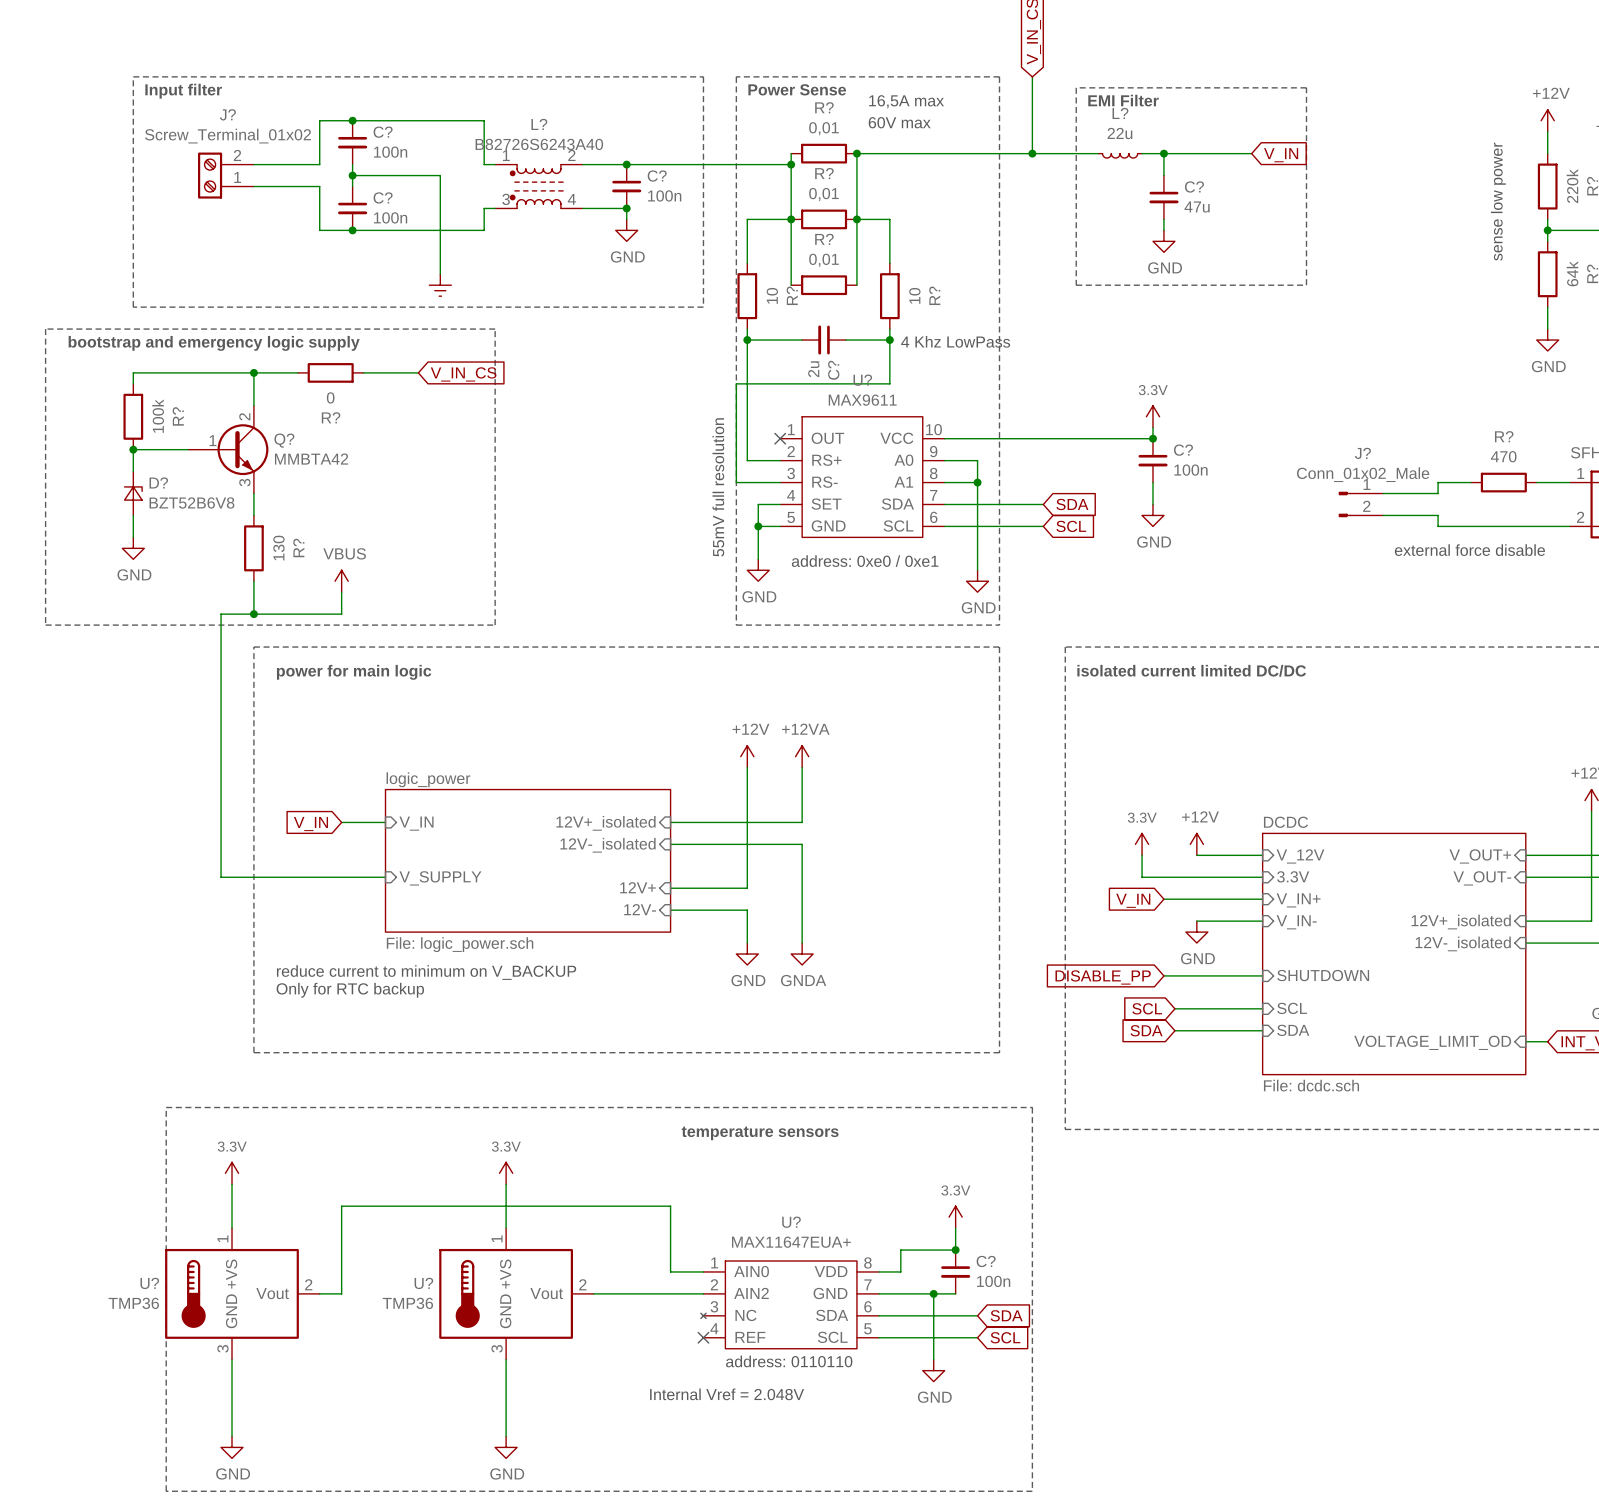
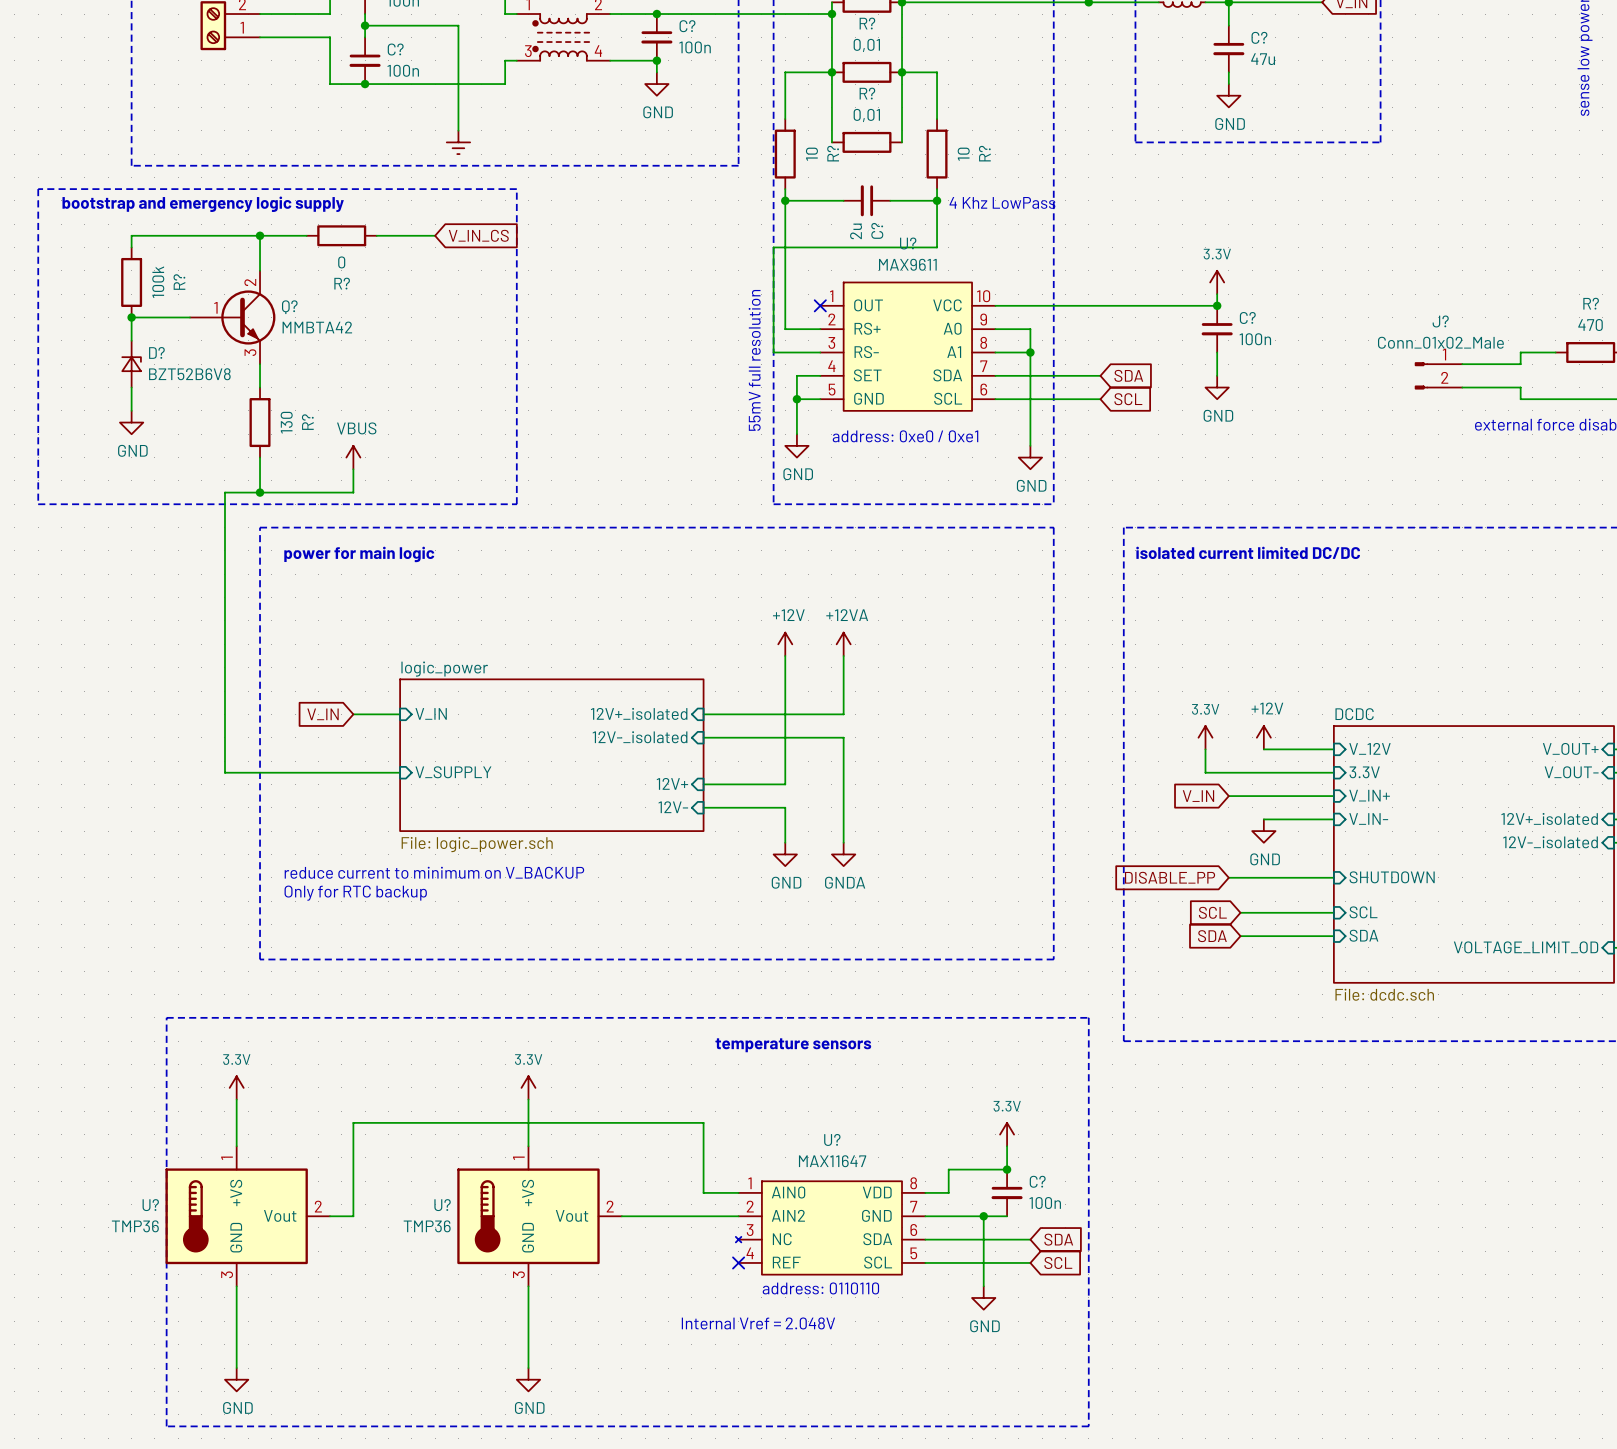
U? value: MAX11647EUA+ (791, 1242) -> MAX11647 (832, 1161)

